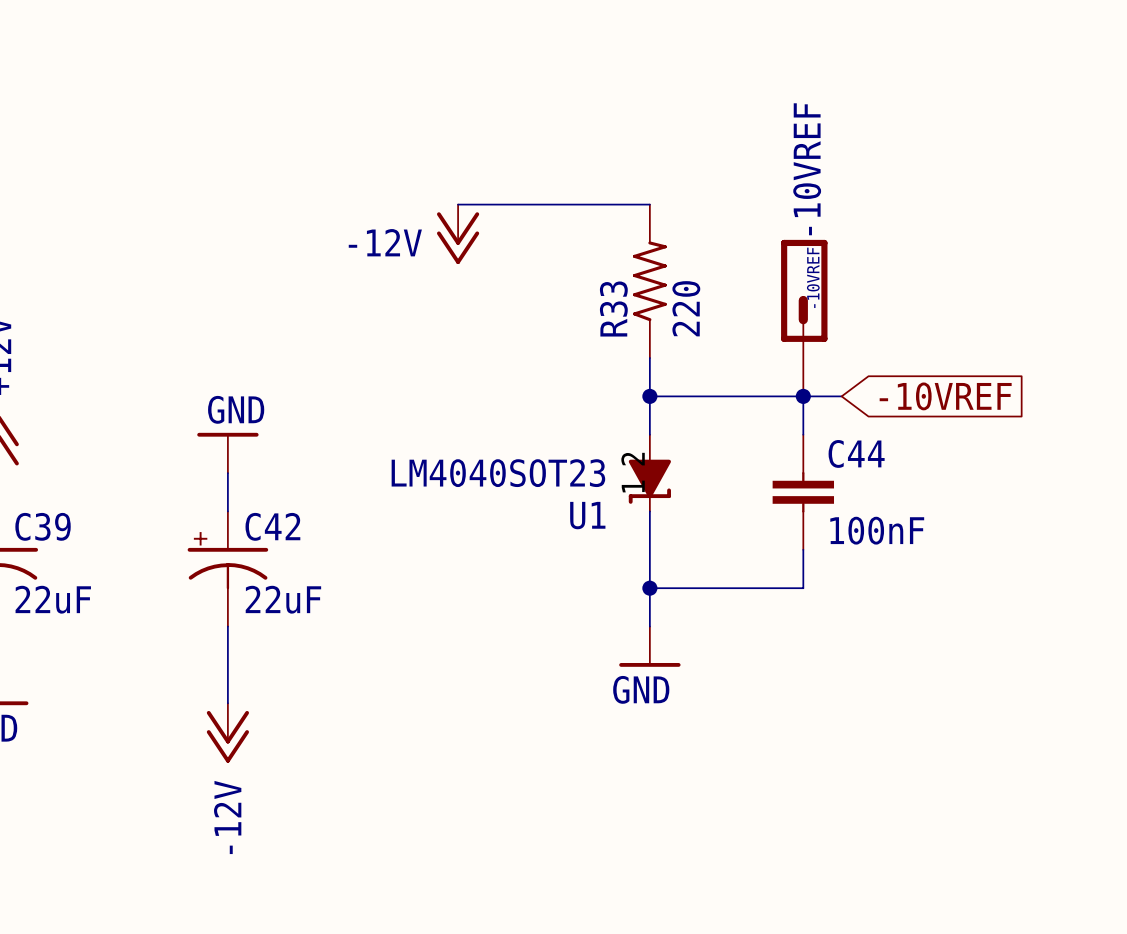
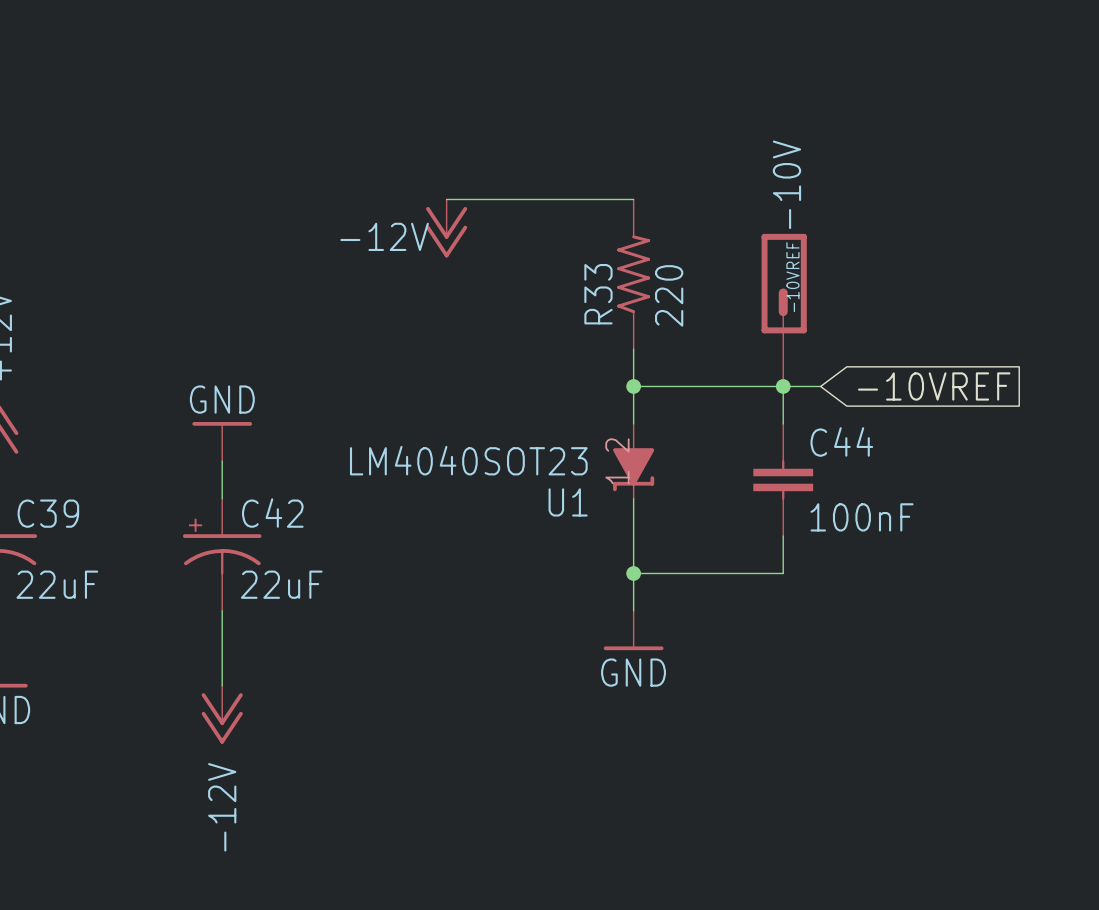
-10VREF value: -10VREF (807, 169) -> -10V (786, 184)

